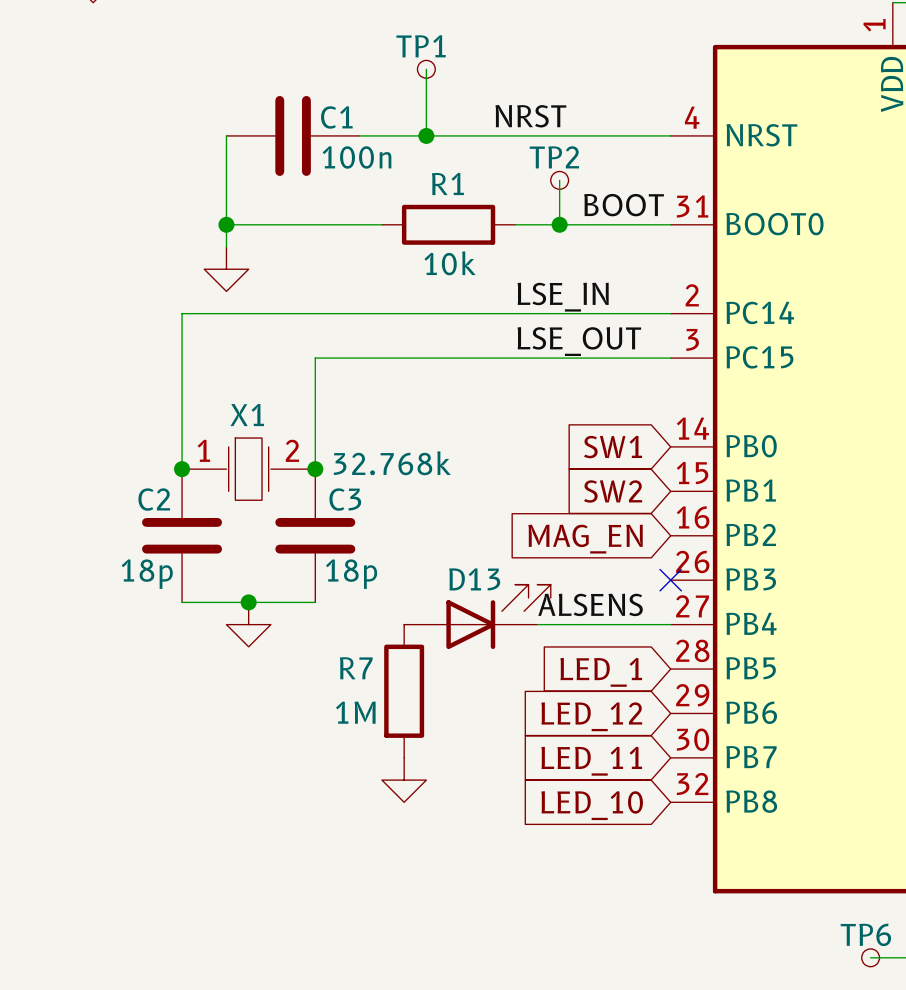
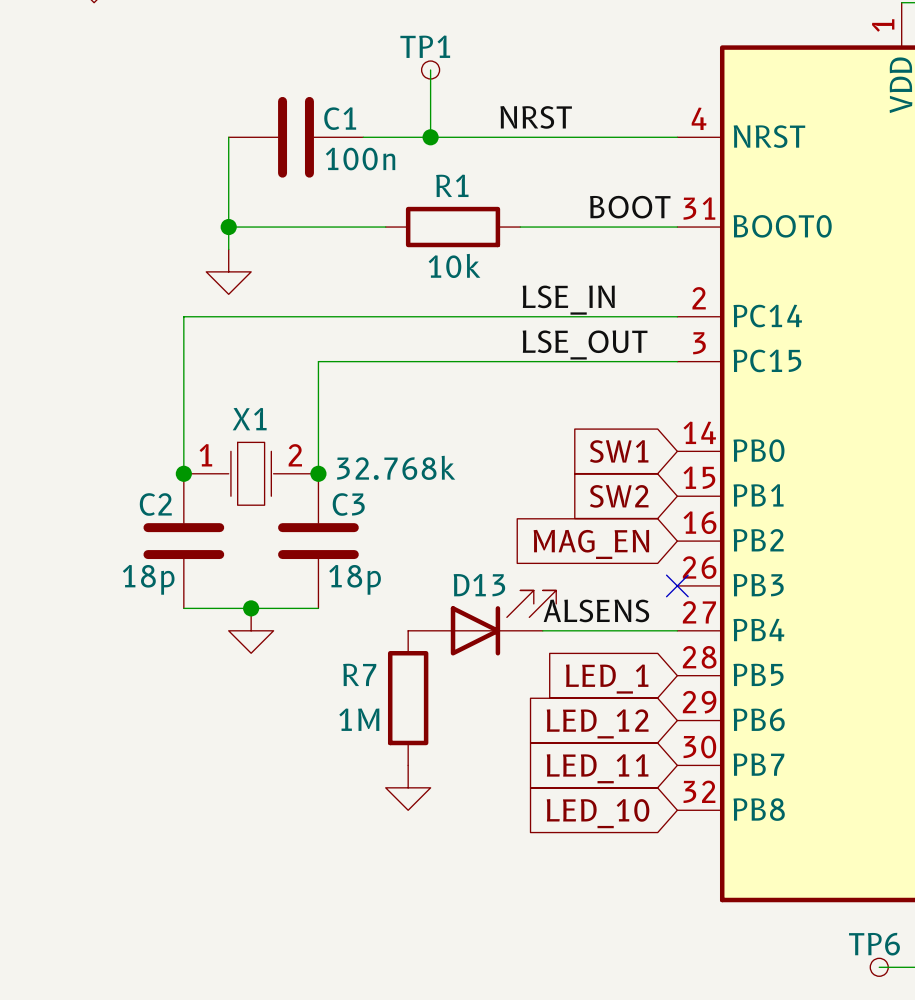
wire: (559, 180) (559, 224) -> none
TP2: (559, 180) -> none
junction: (559, 224) -> none

